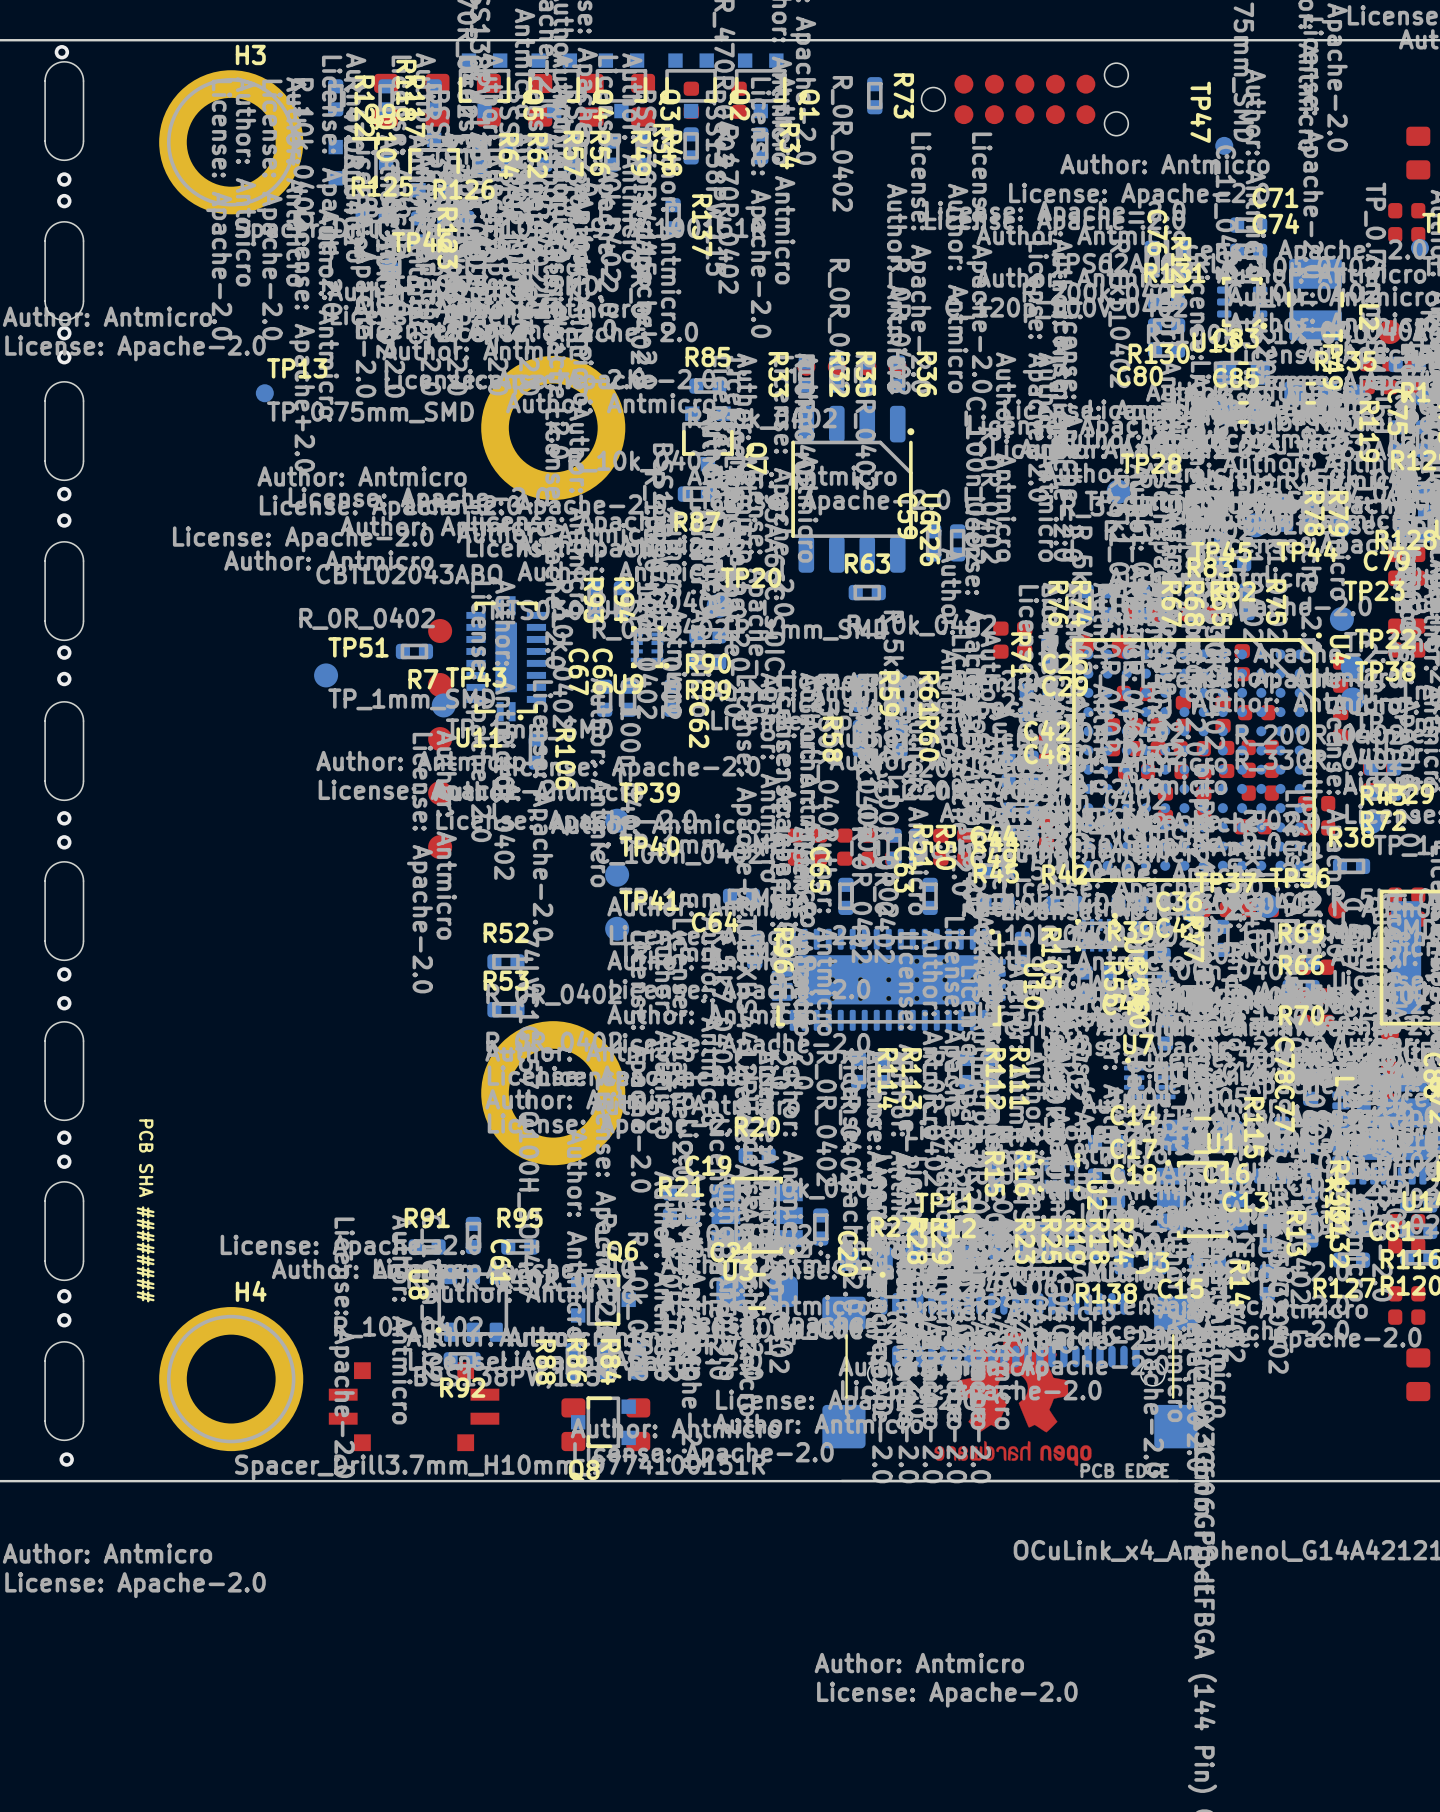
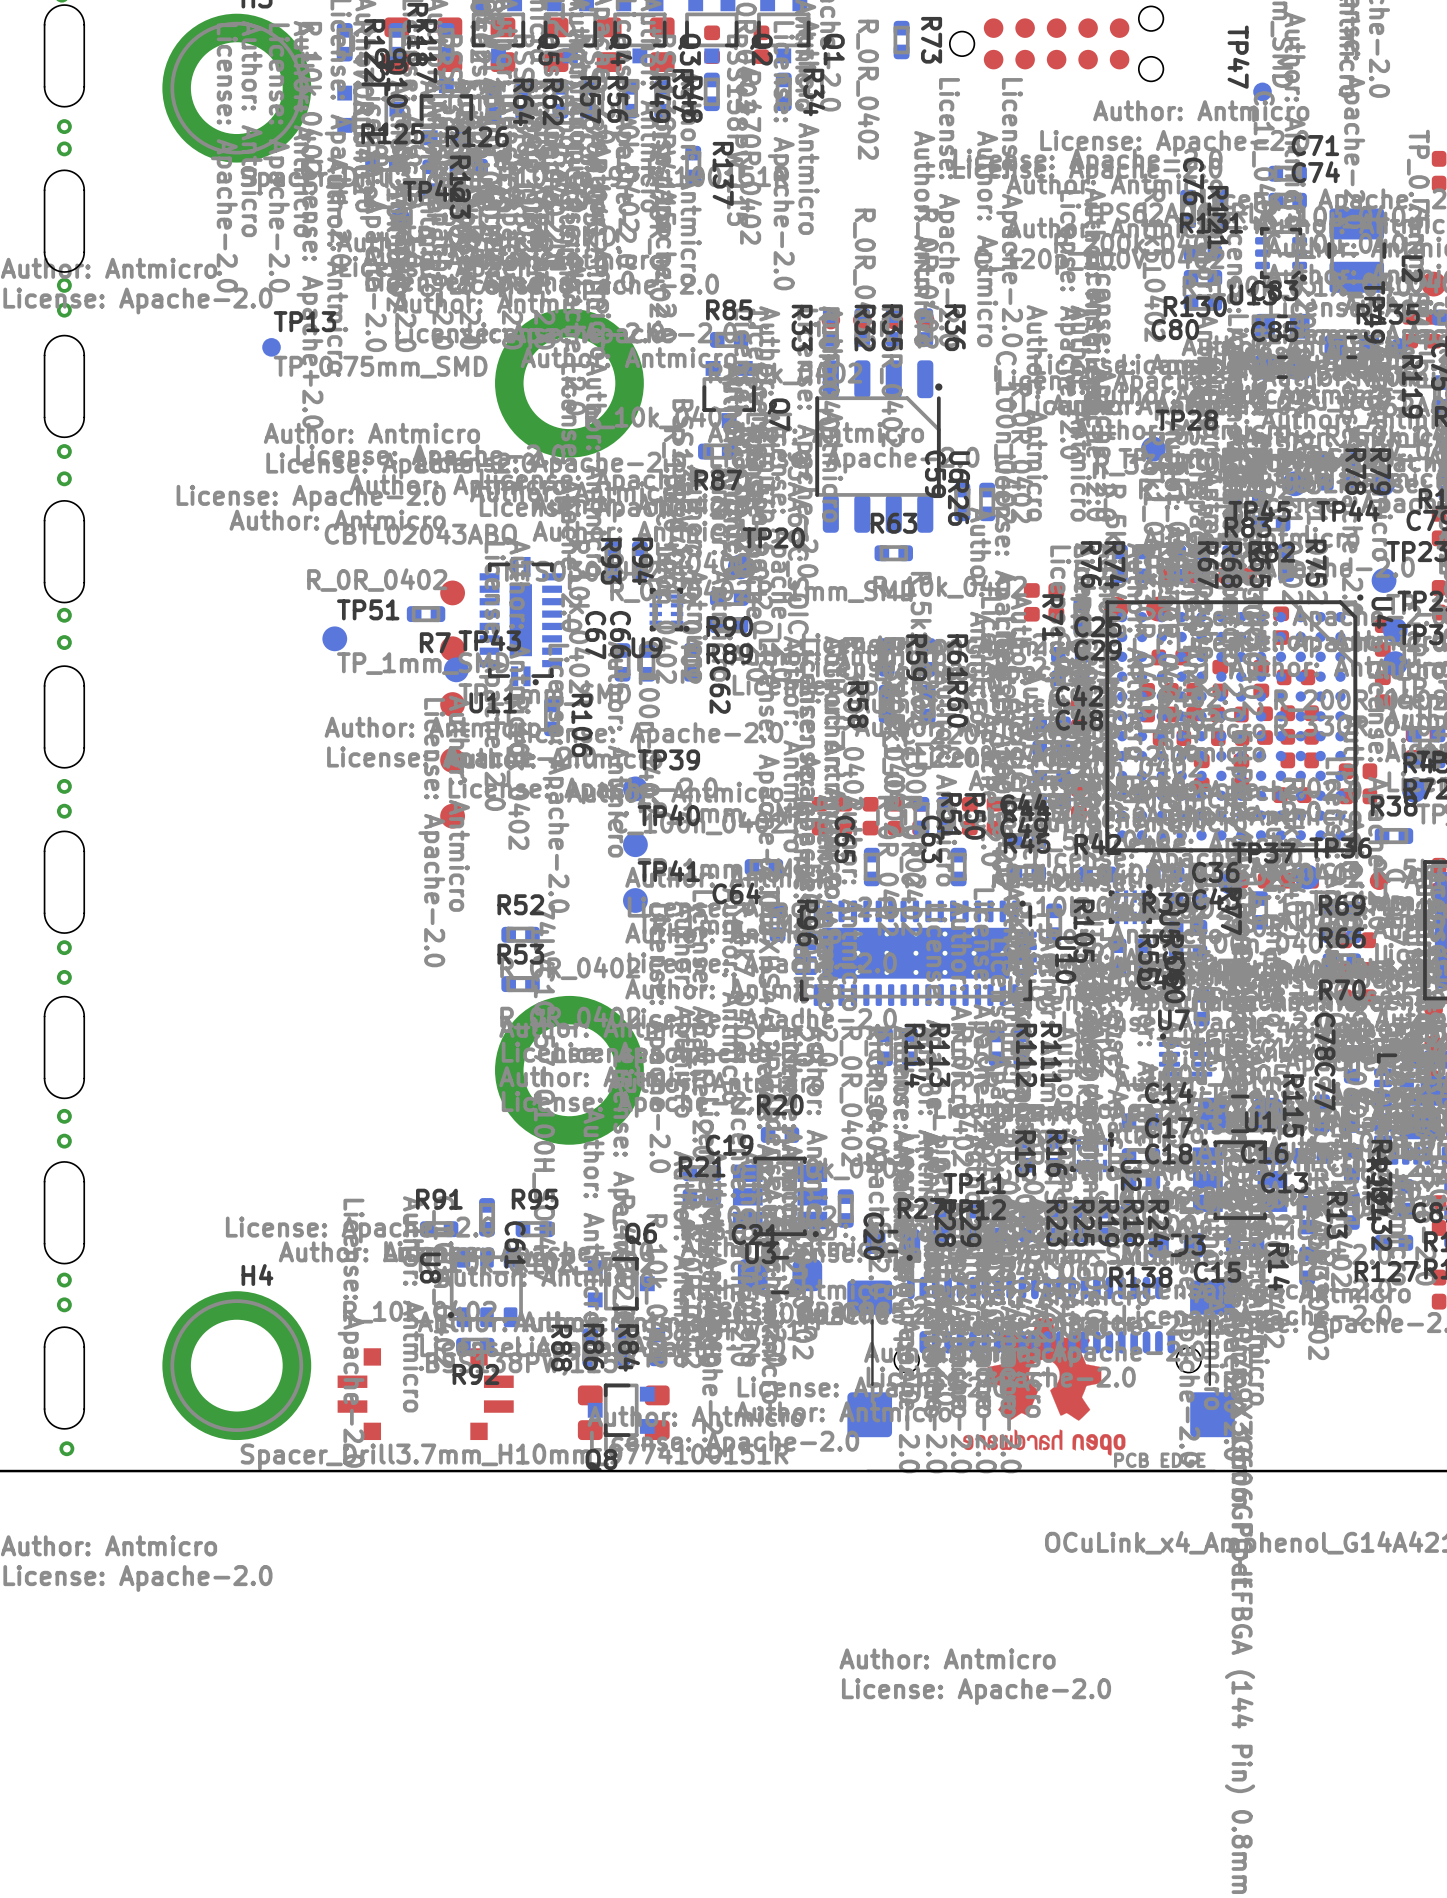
text: PCB SHA ######## (145, 1210) -> none

